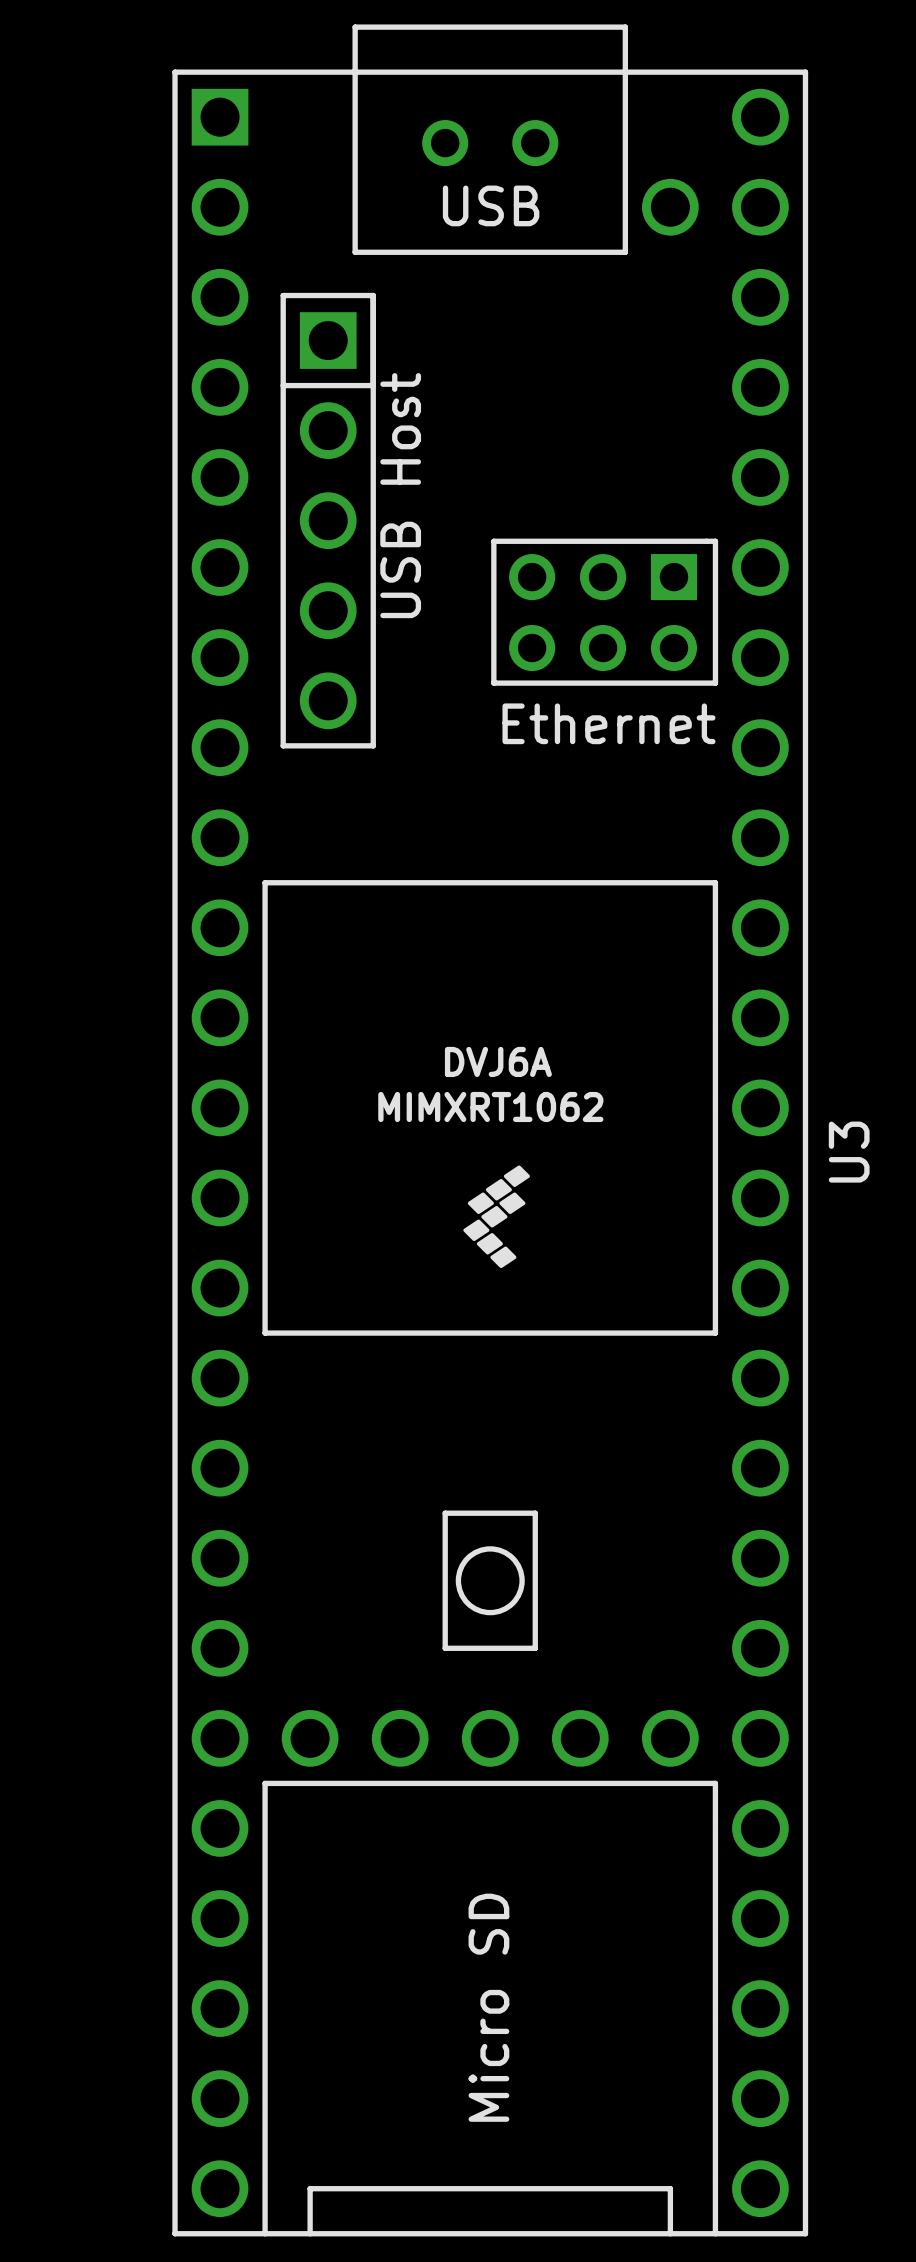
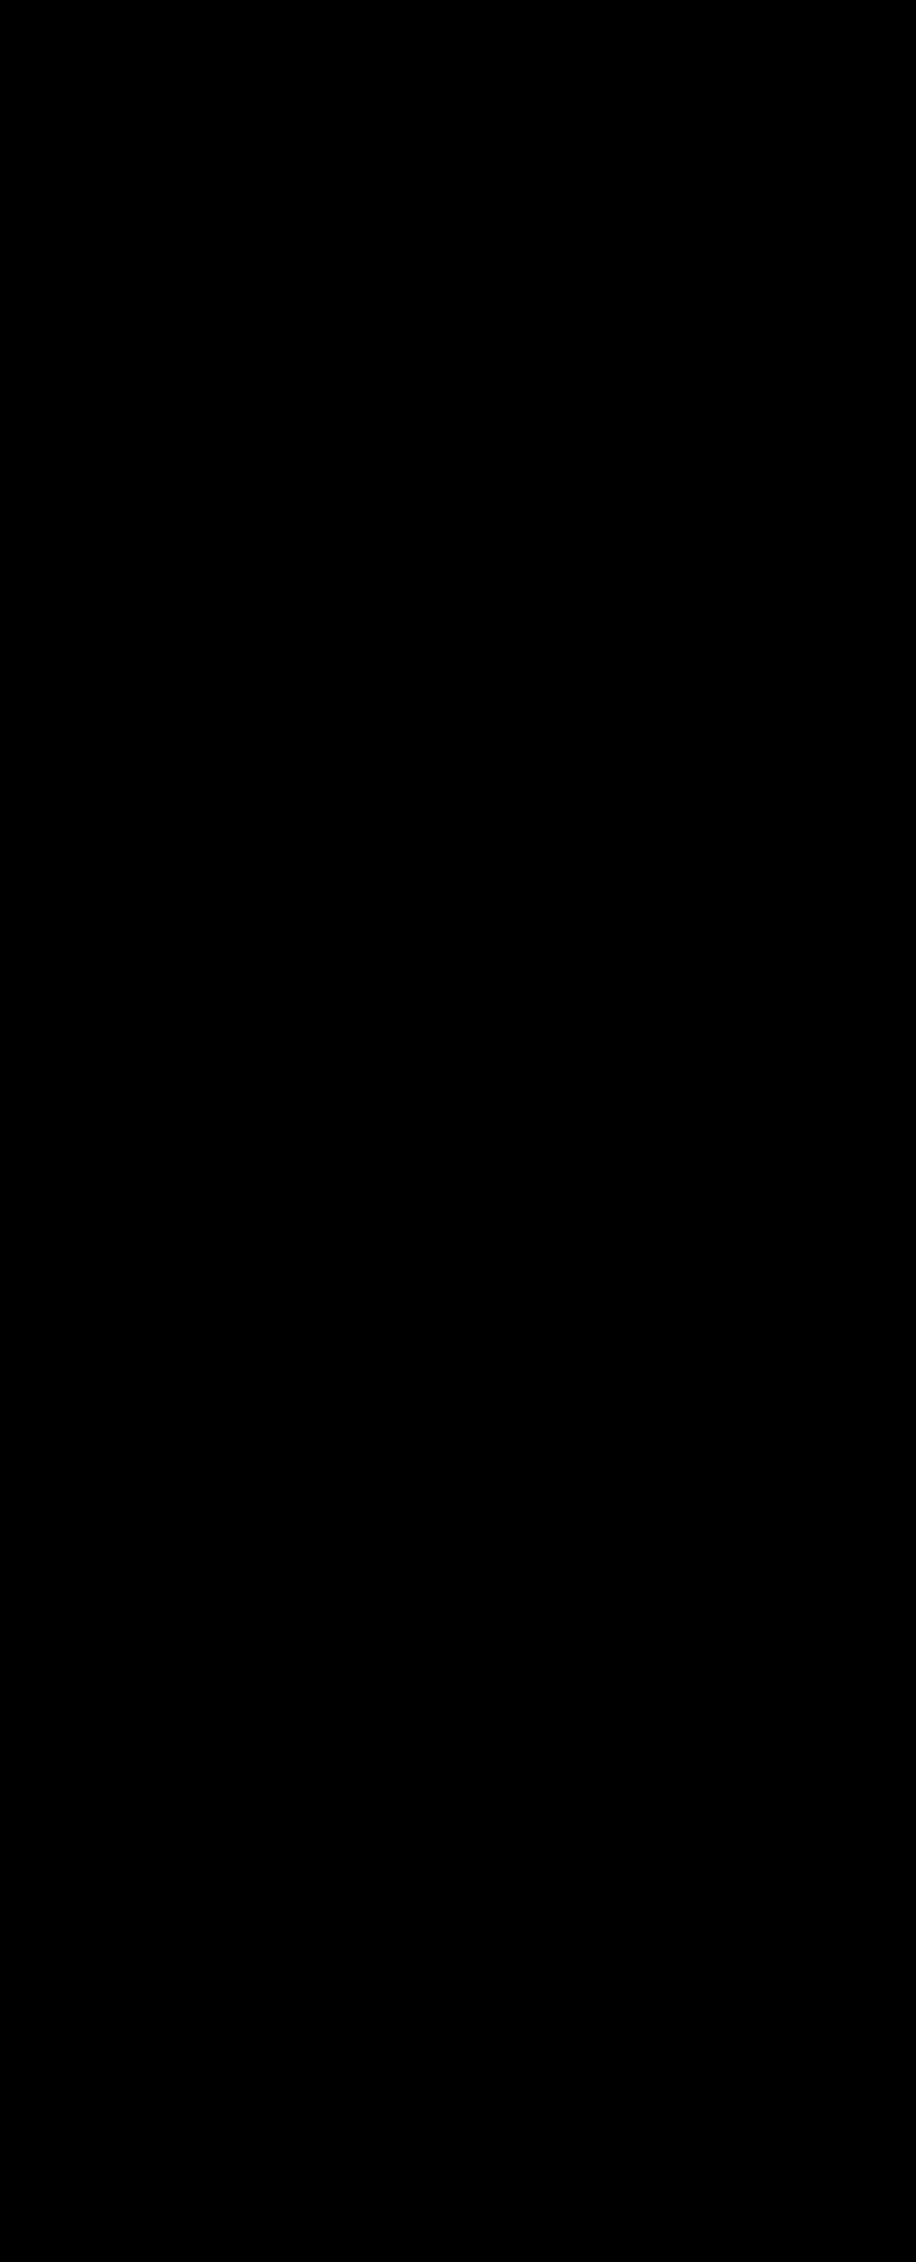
U3: (490, 1130) -> none

